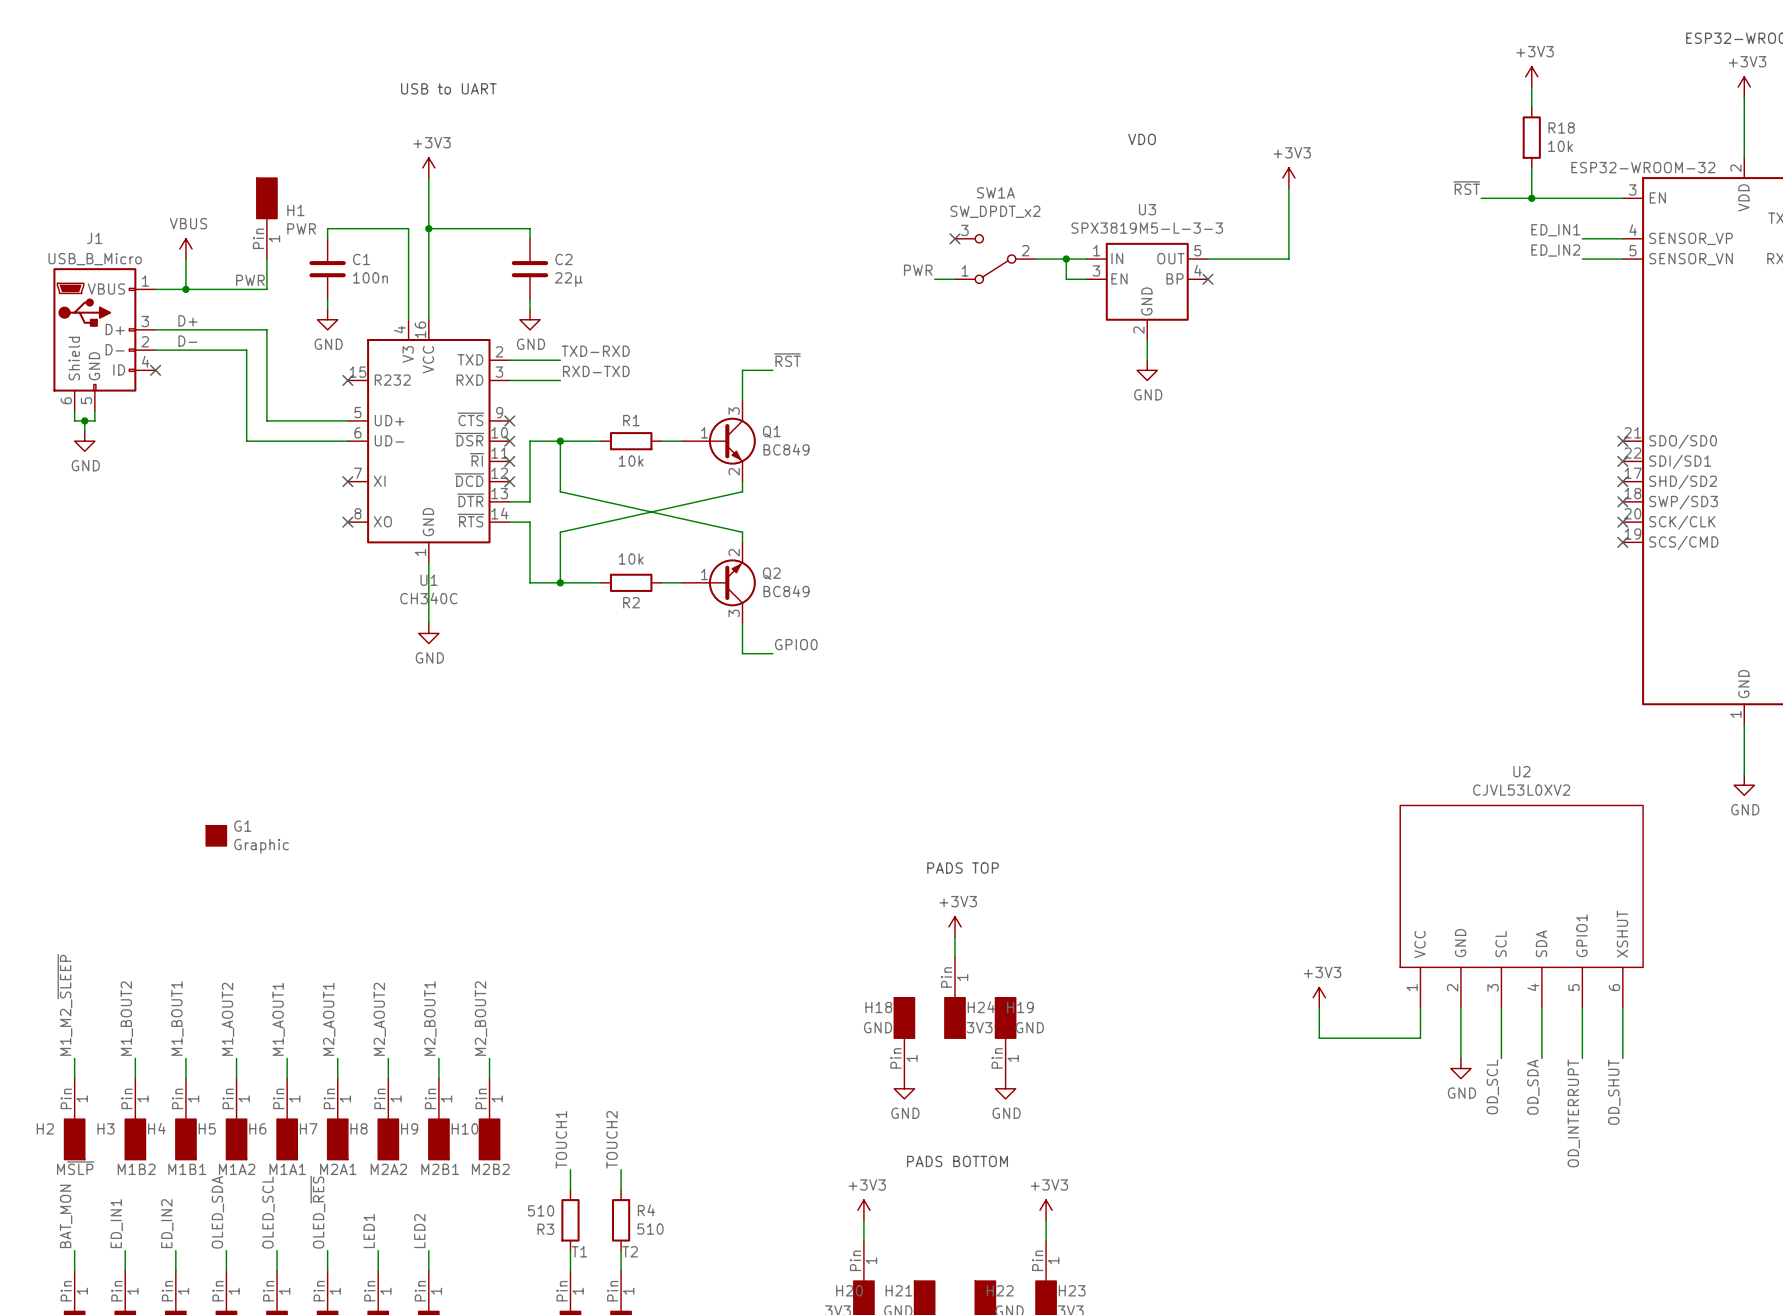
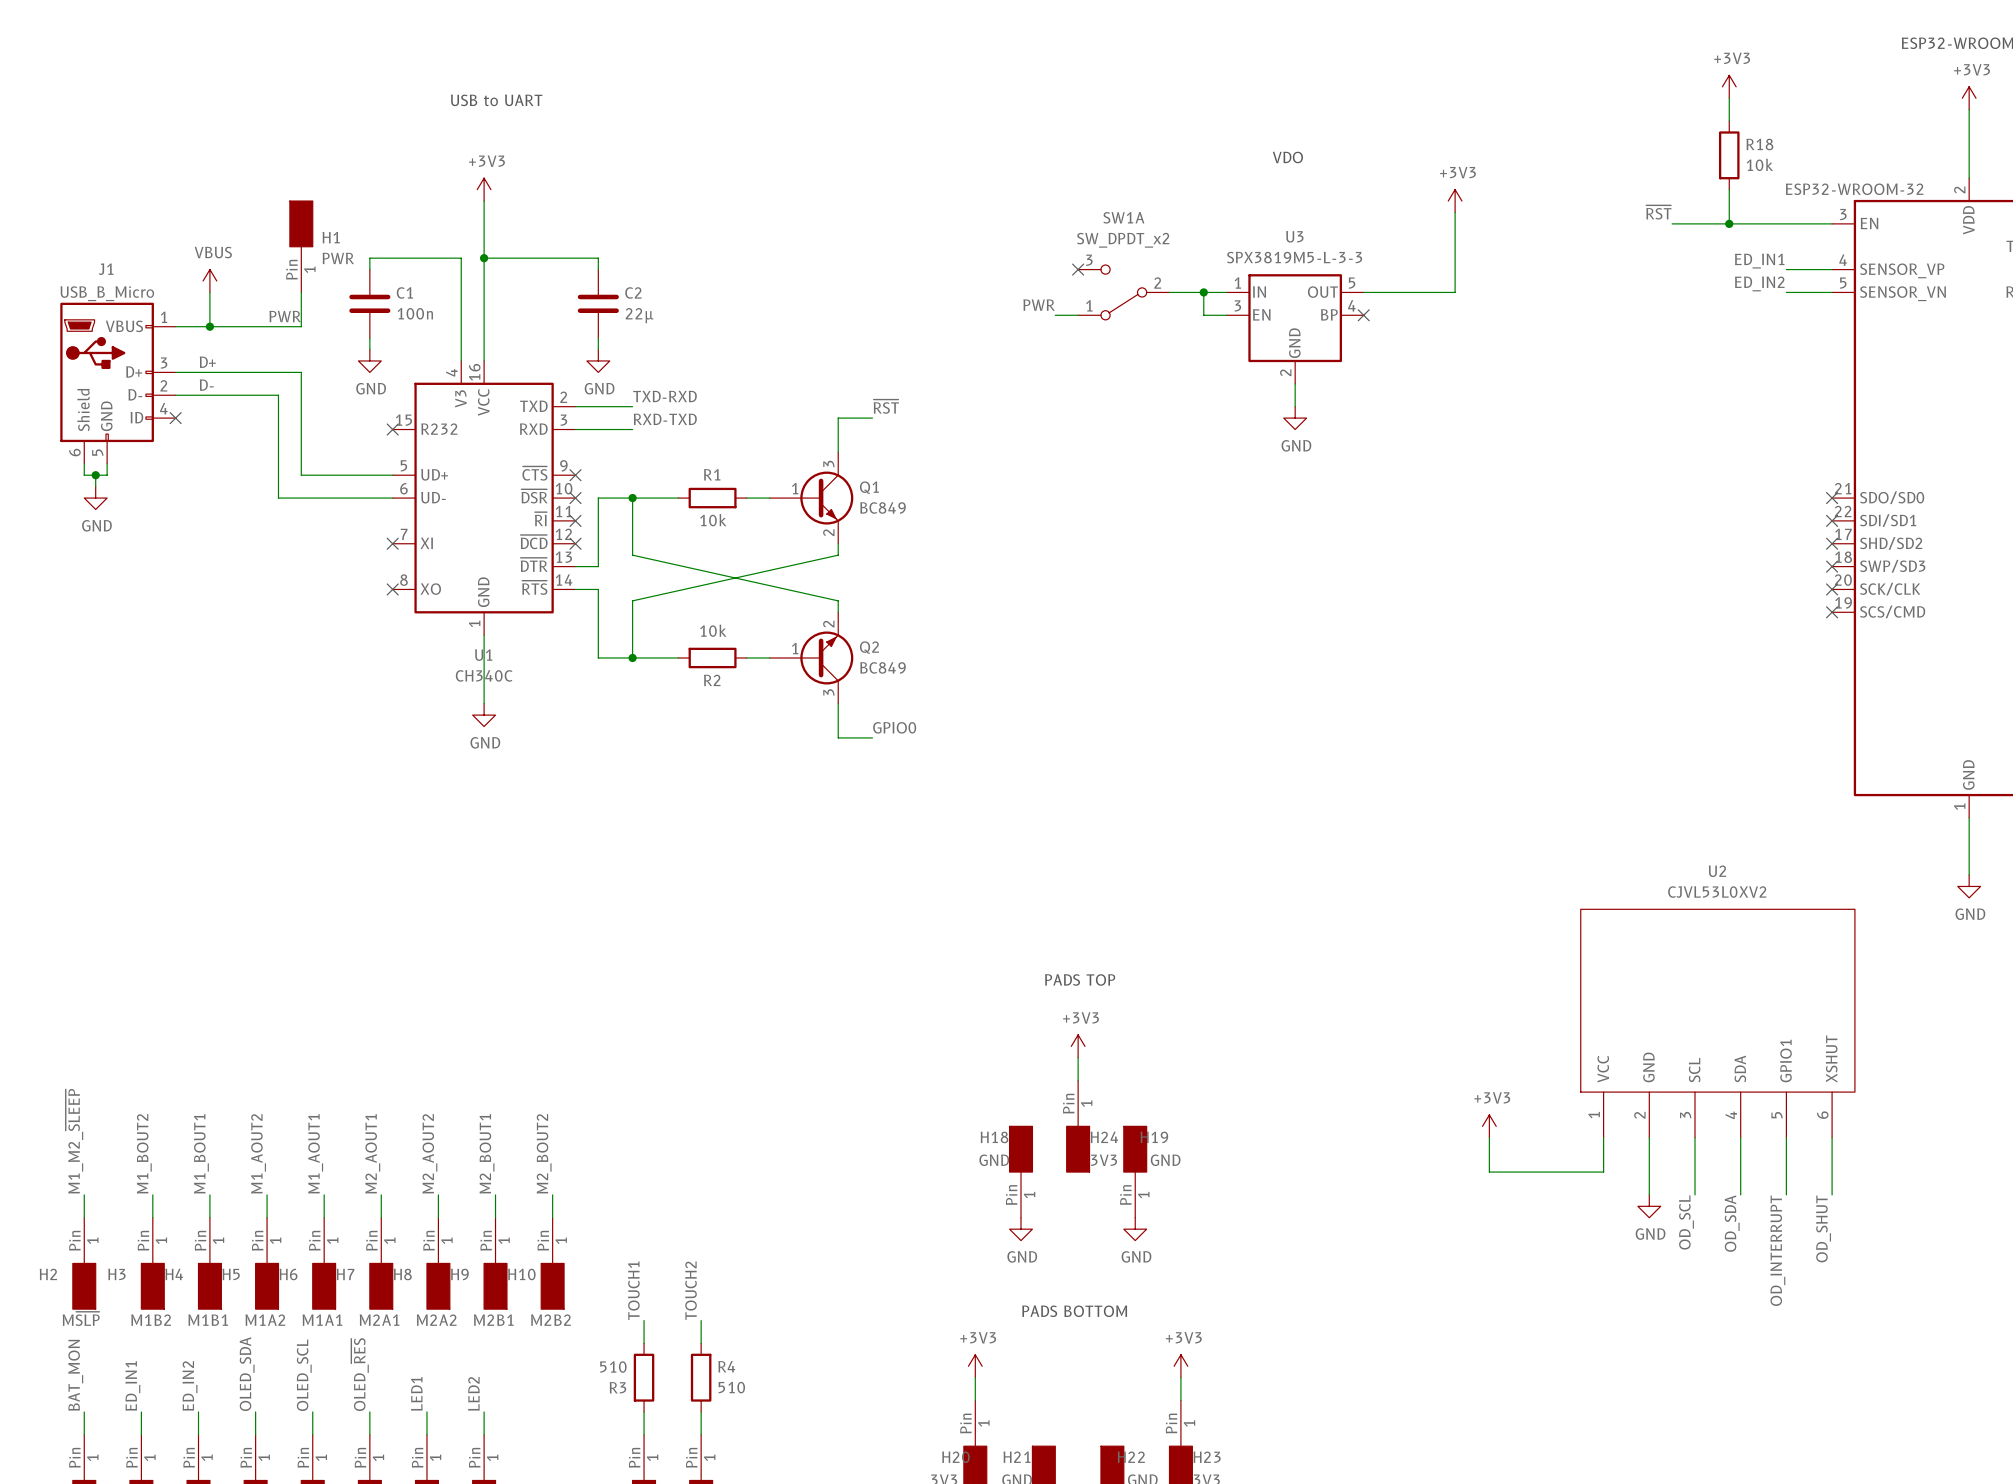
G1: Graphic (216, 835) -> none
label: T1 (579, 1251) -> none
label: T2 (630, 1251) -> none

